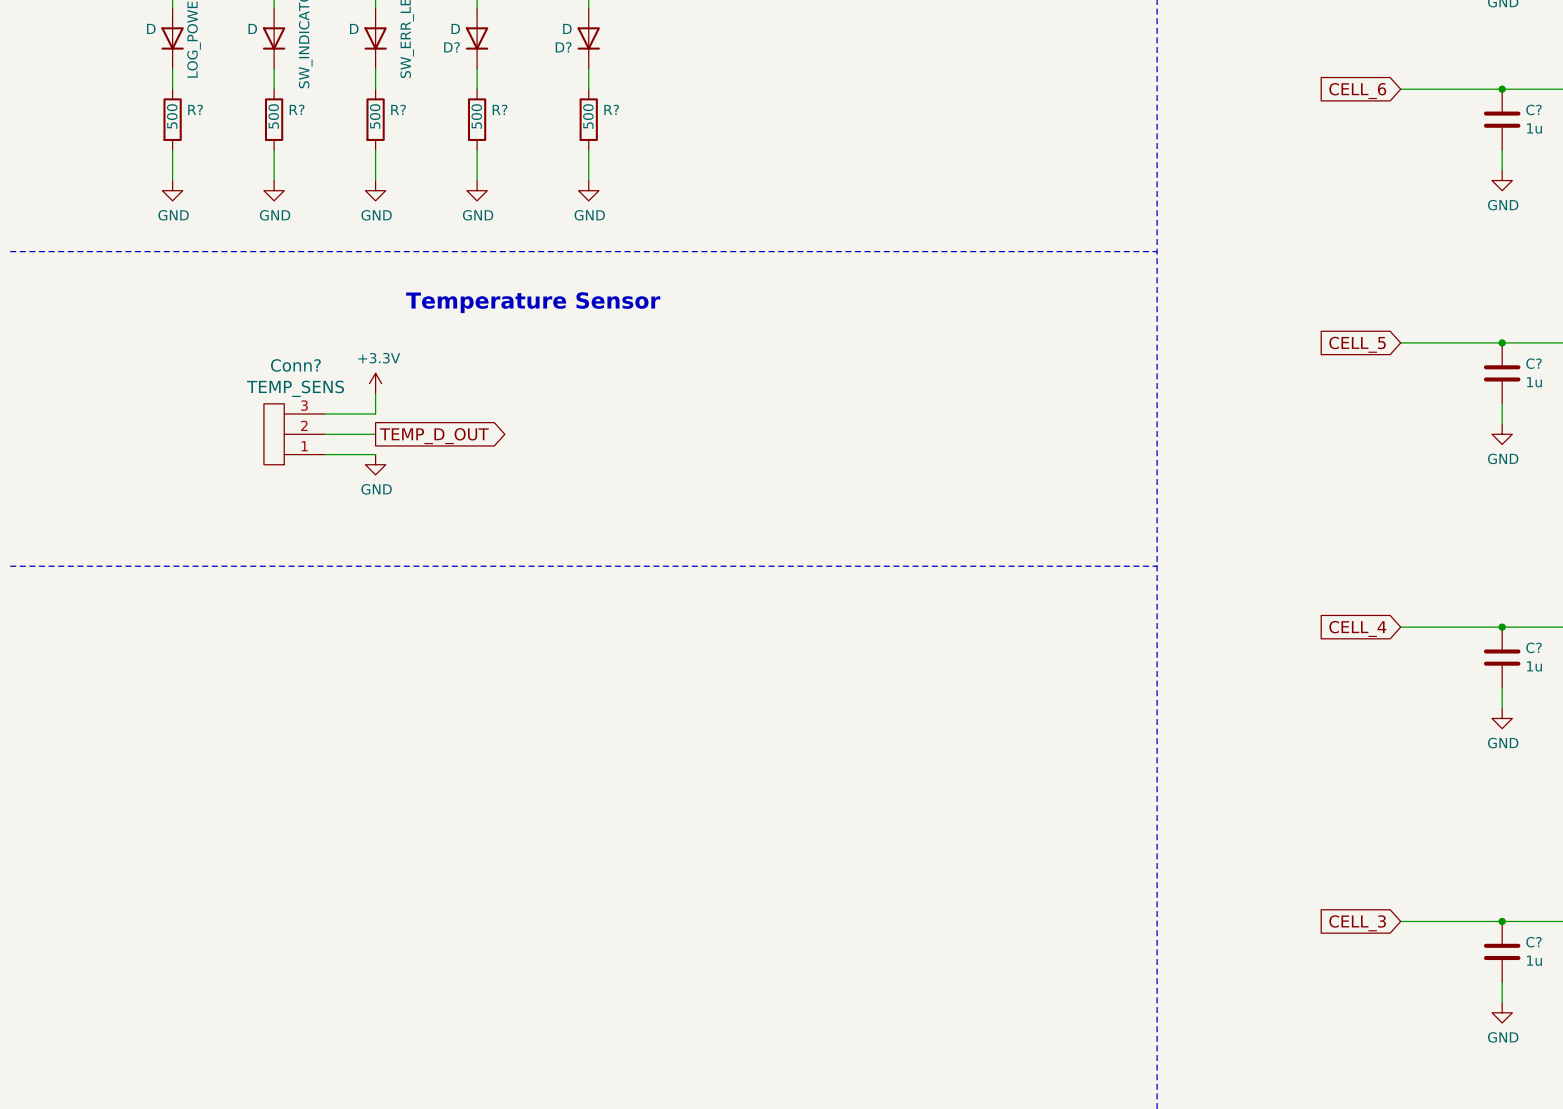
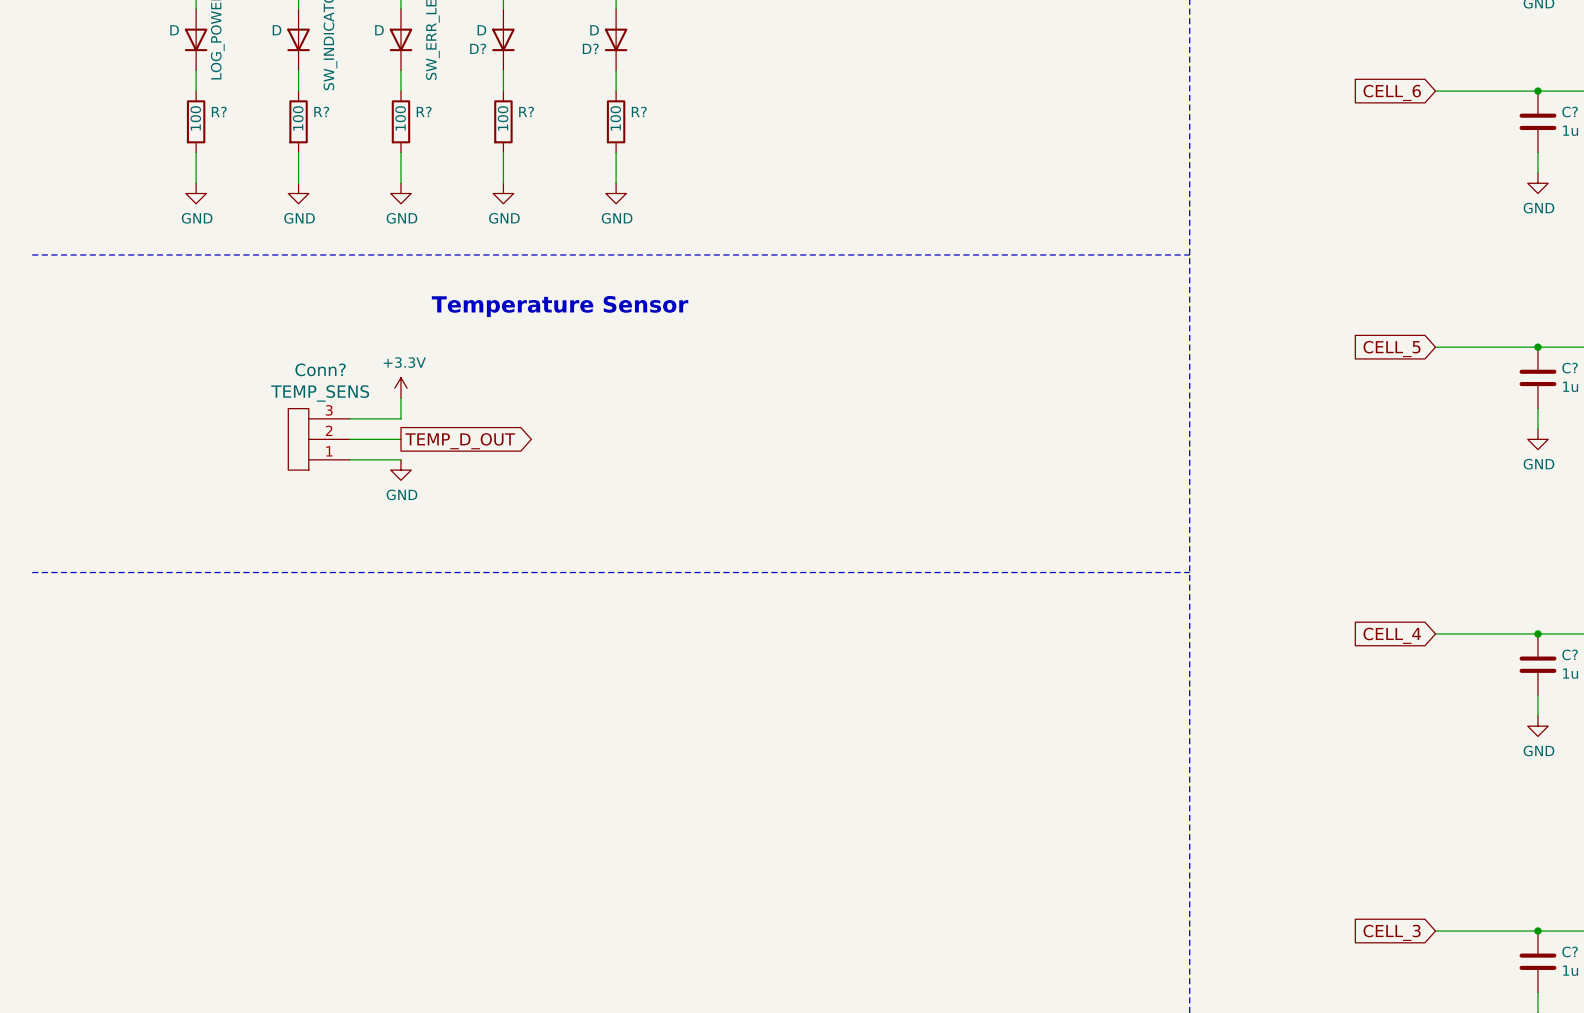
R? value: 500 (172, 116) -> 100 (195, 118)
R? value: 500 (273, 116) -> 100 (298, 118)
R? value: 500 (375, 116) -> 100 (400, 118)
R? value: 500 (476, 116) -> 100 (503, 118)
R? value: 500 (588, 116) -> 100 (615, 118)

